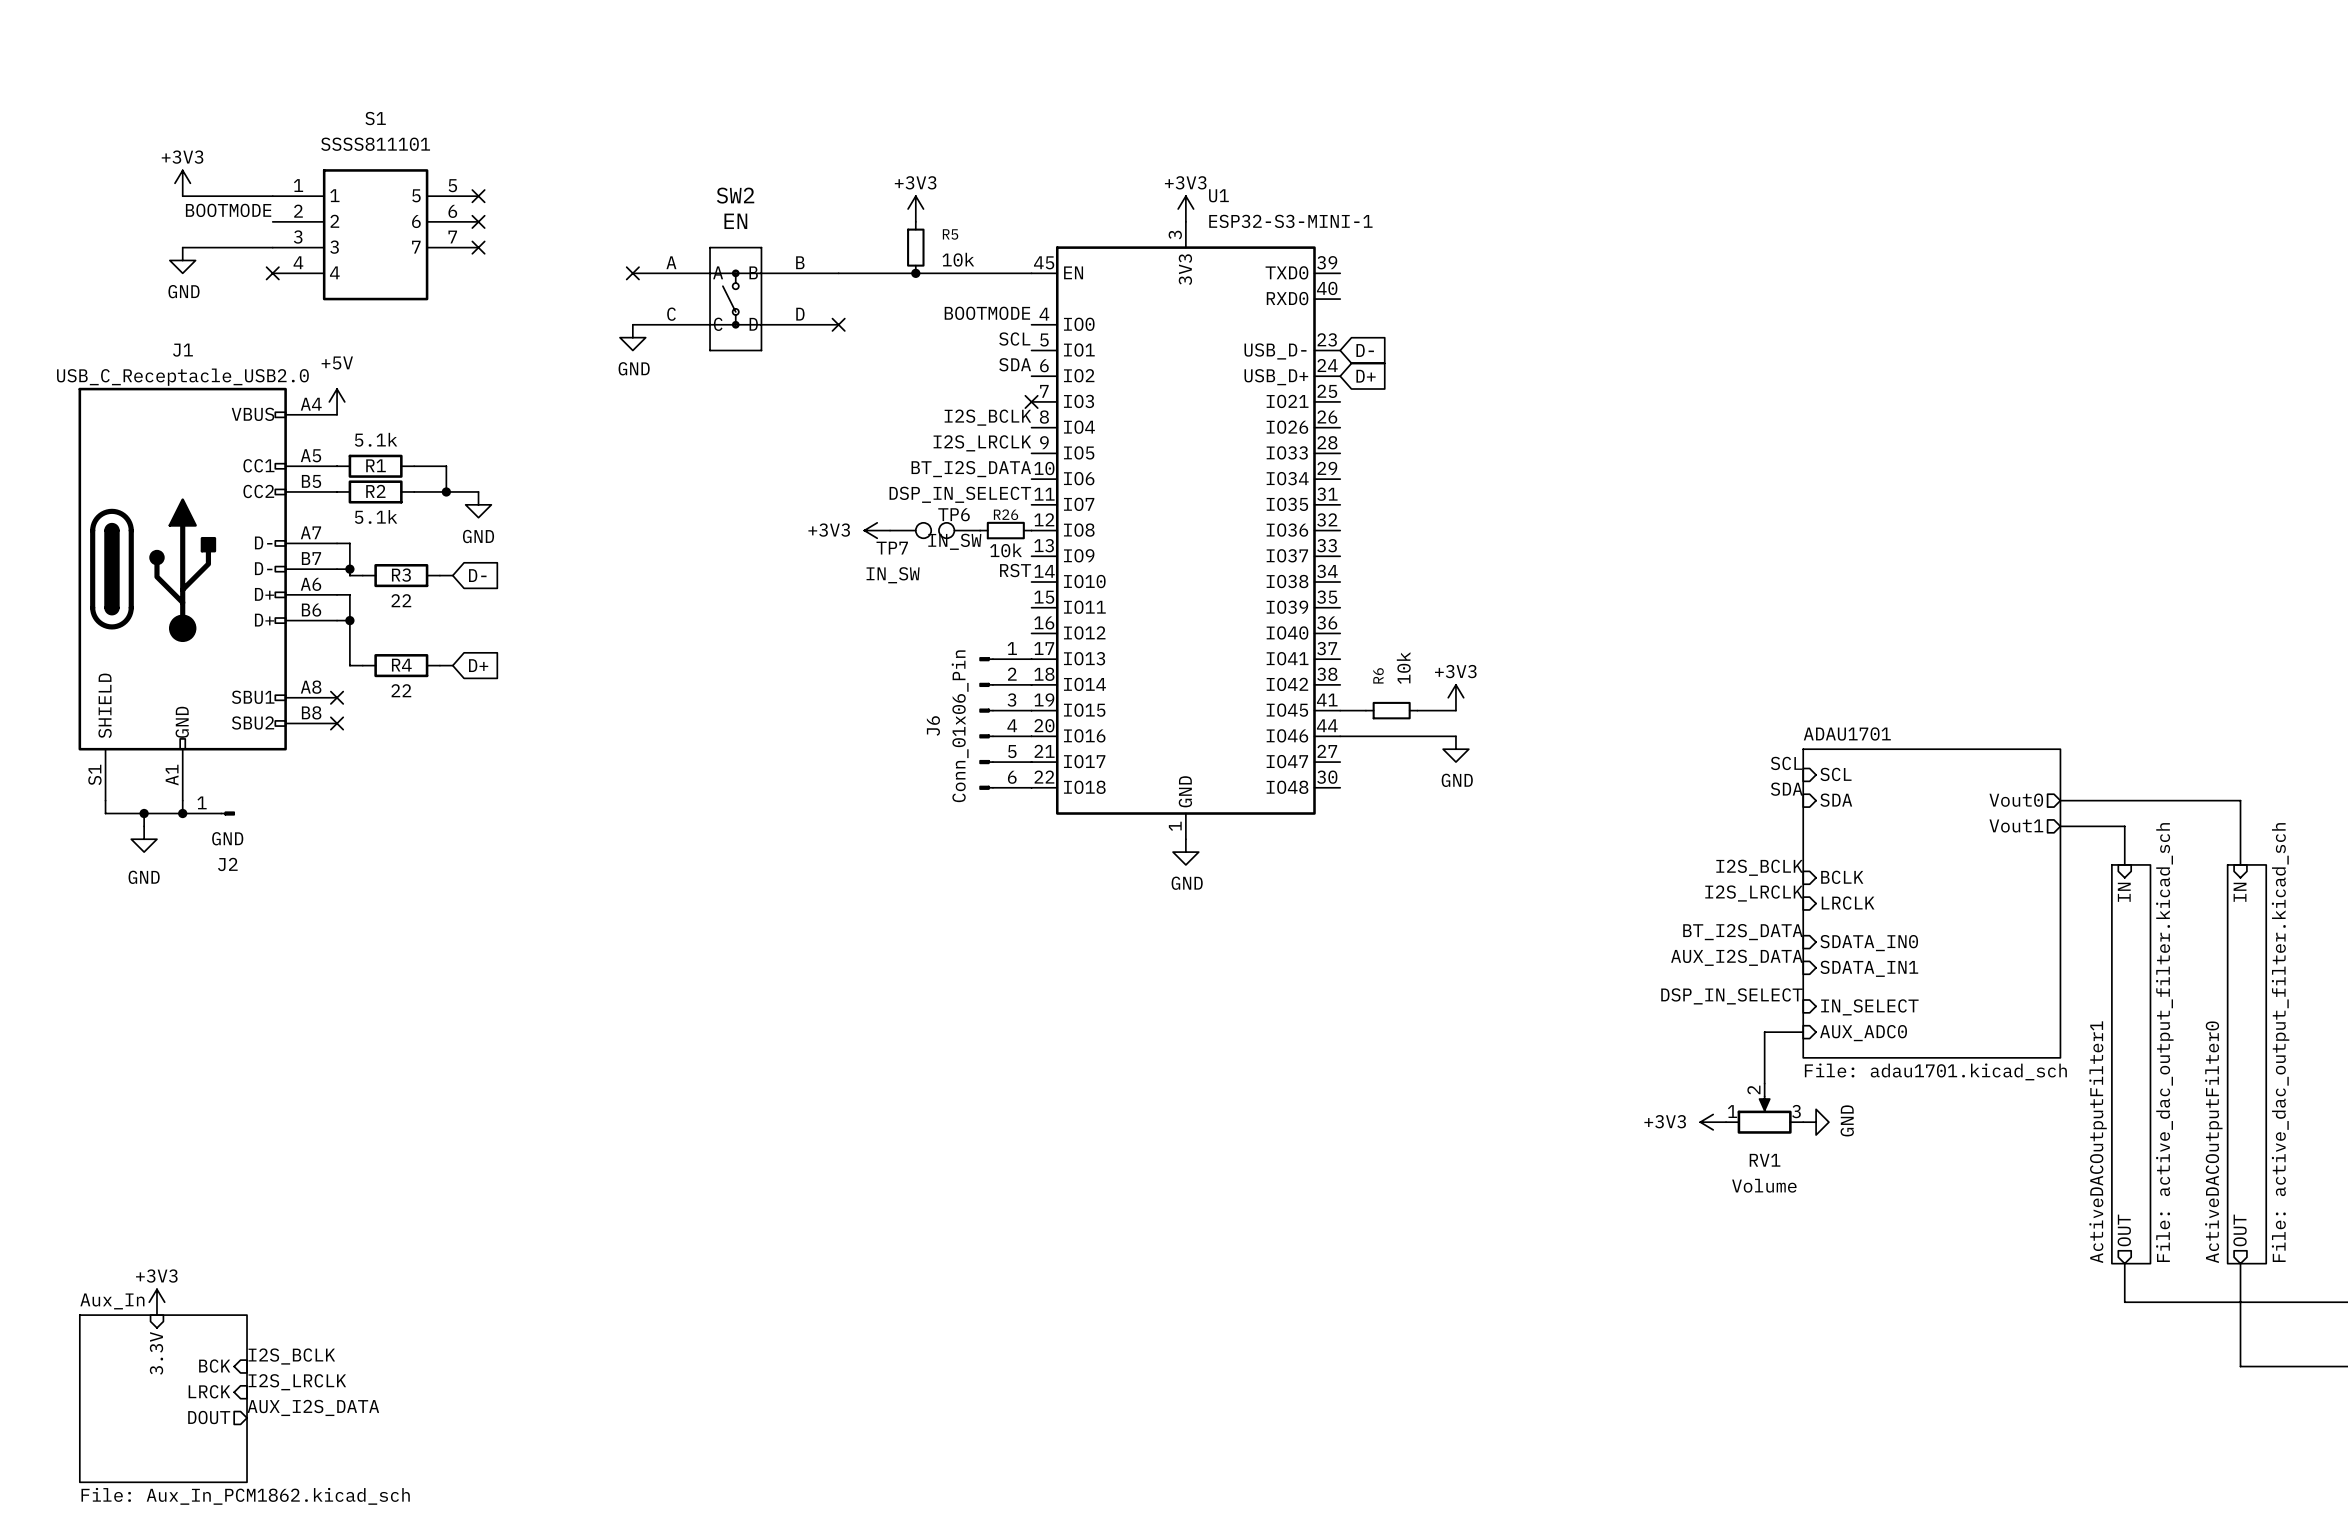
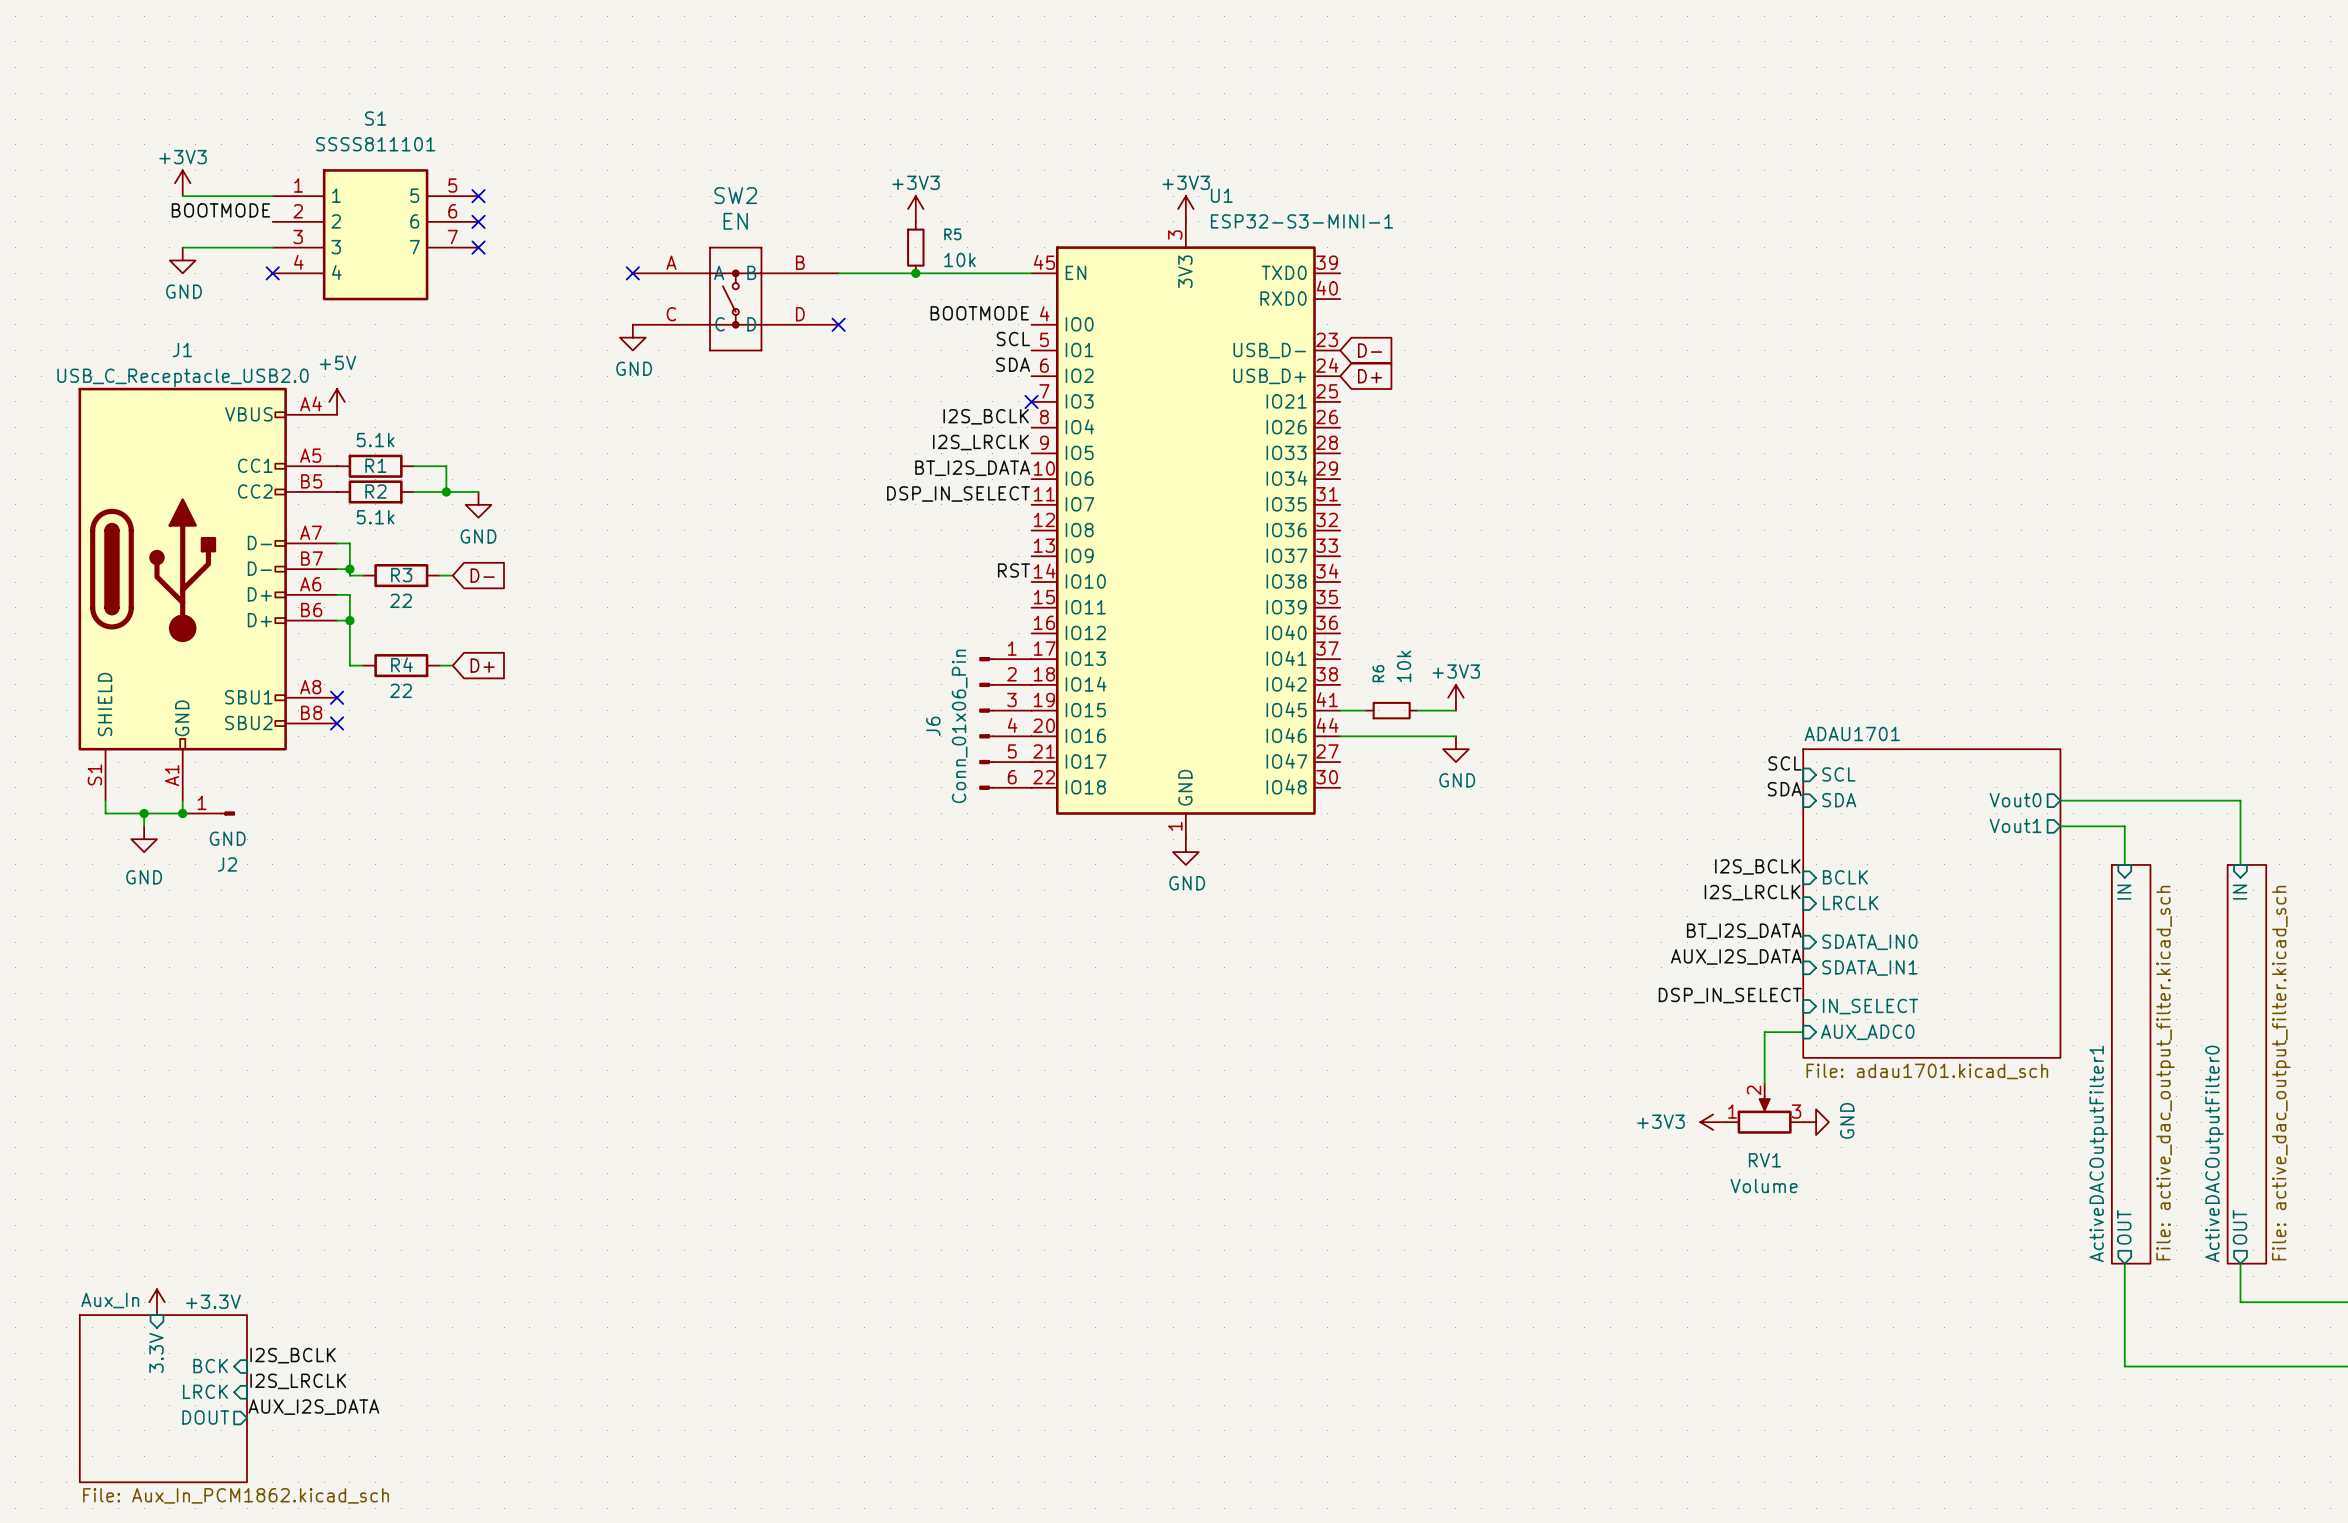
power symbol: +3V3 (877, 530) -> none
TP7: IN_SW (910, 530) -> none
TP6: IN_SW (959, 530) -> none
R26: 10k (1005, 530) -> none
power symbol: +3V3 (156, 1302) -> +3.3V (156, 1302)
wire: (2124, 1302) (2240, 1302) (2240, 1366) -> (2124, 1302) (2124, 1366) (2240, 1366)

